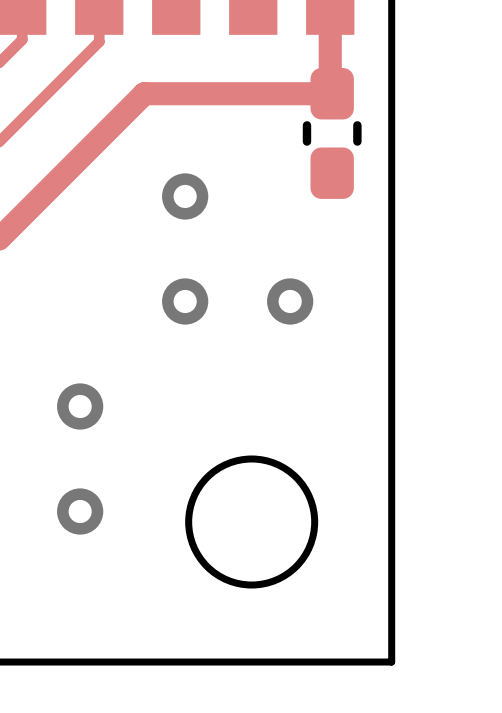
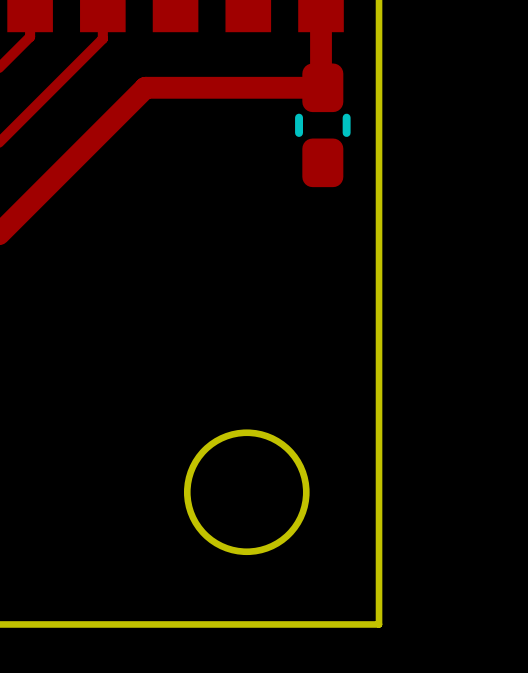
via: (185, 196) -> none
via: (185, 301) -> none
via: (290, 301) -> none
via: (80, 406) -> none
via: (80, 511) -> none

